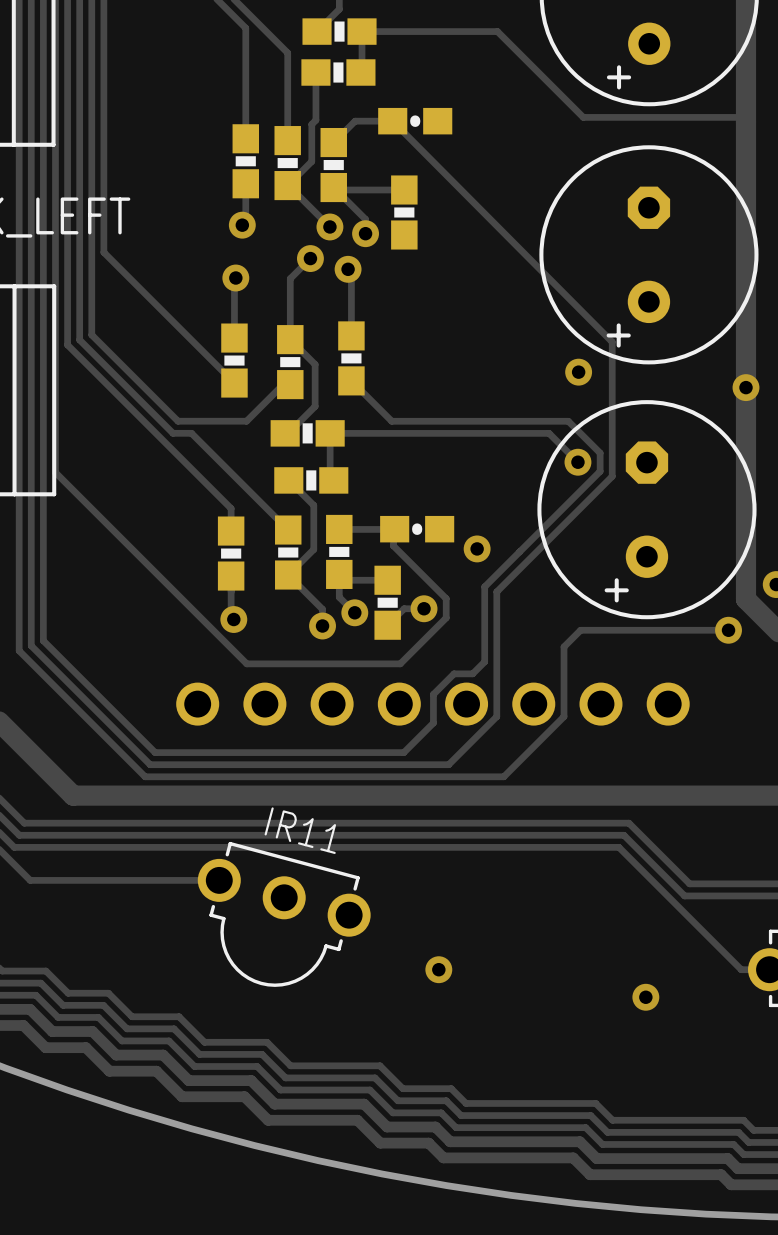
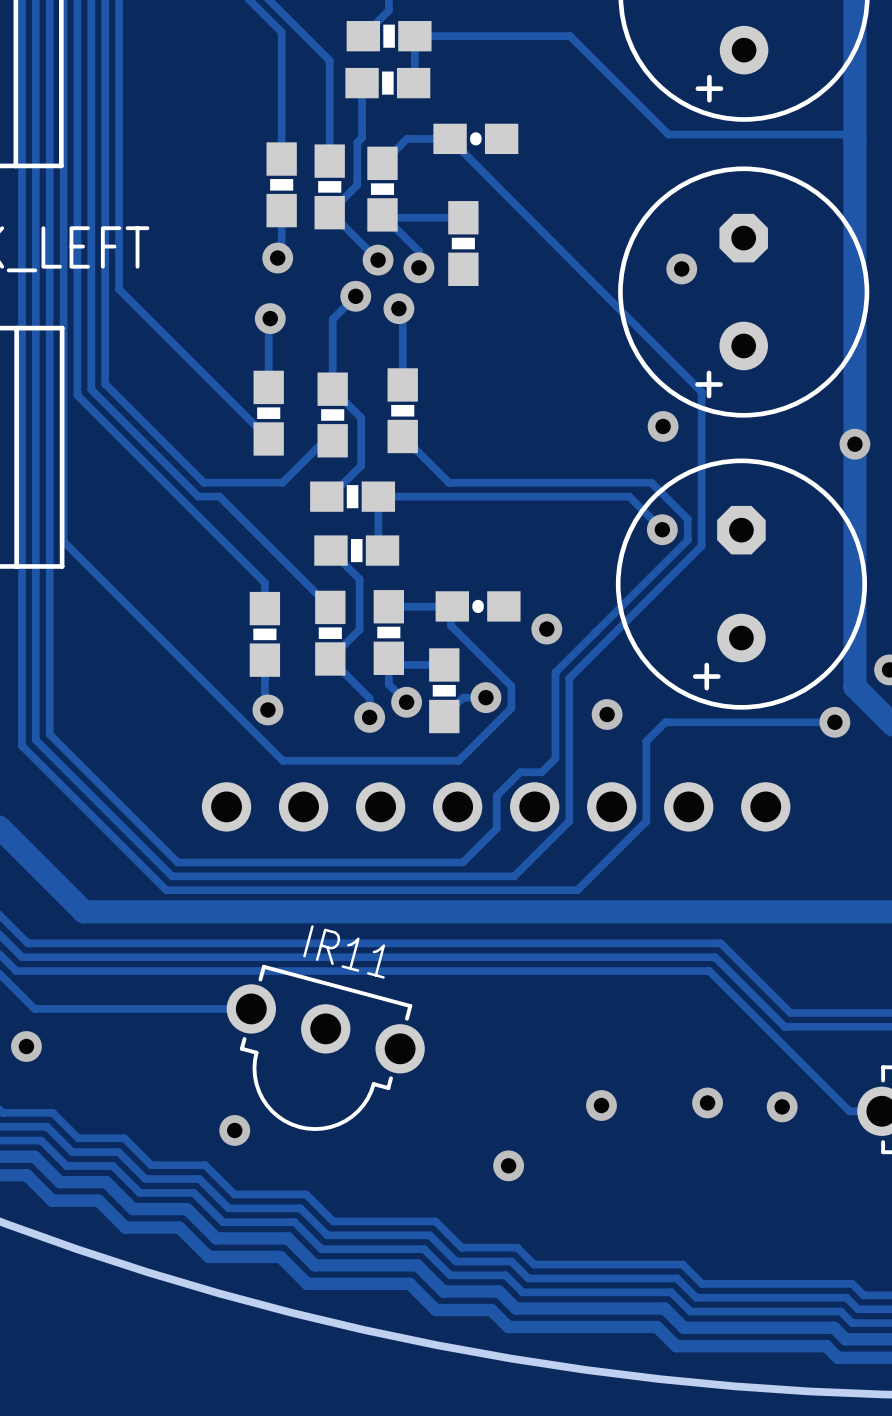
via: none -> (681, 268)
via: none -> (607, 714)
via: none -> (26, 1046)
via: none -> (707, 1102)
via: none -> (601, 1105)
via: none -> (782, 1106)
via: (438, 969) -> none
via: none -> (234, 1130)
via: (645, 997) -> none
via: none -> (508, 1165)

